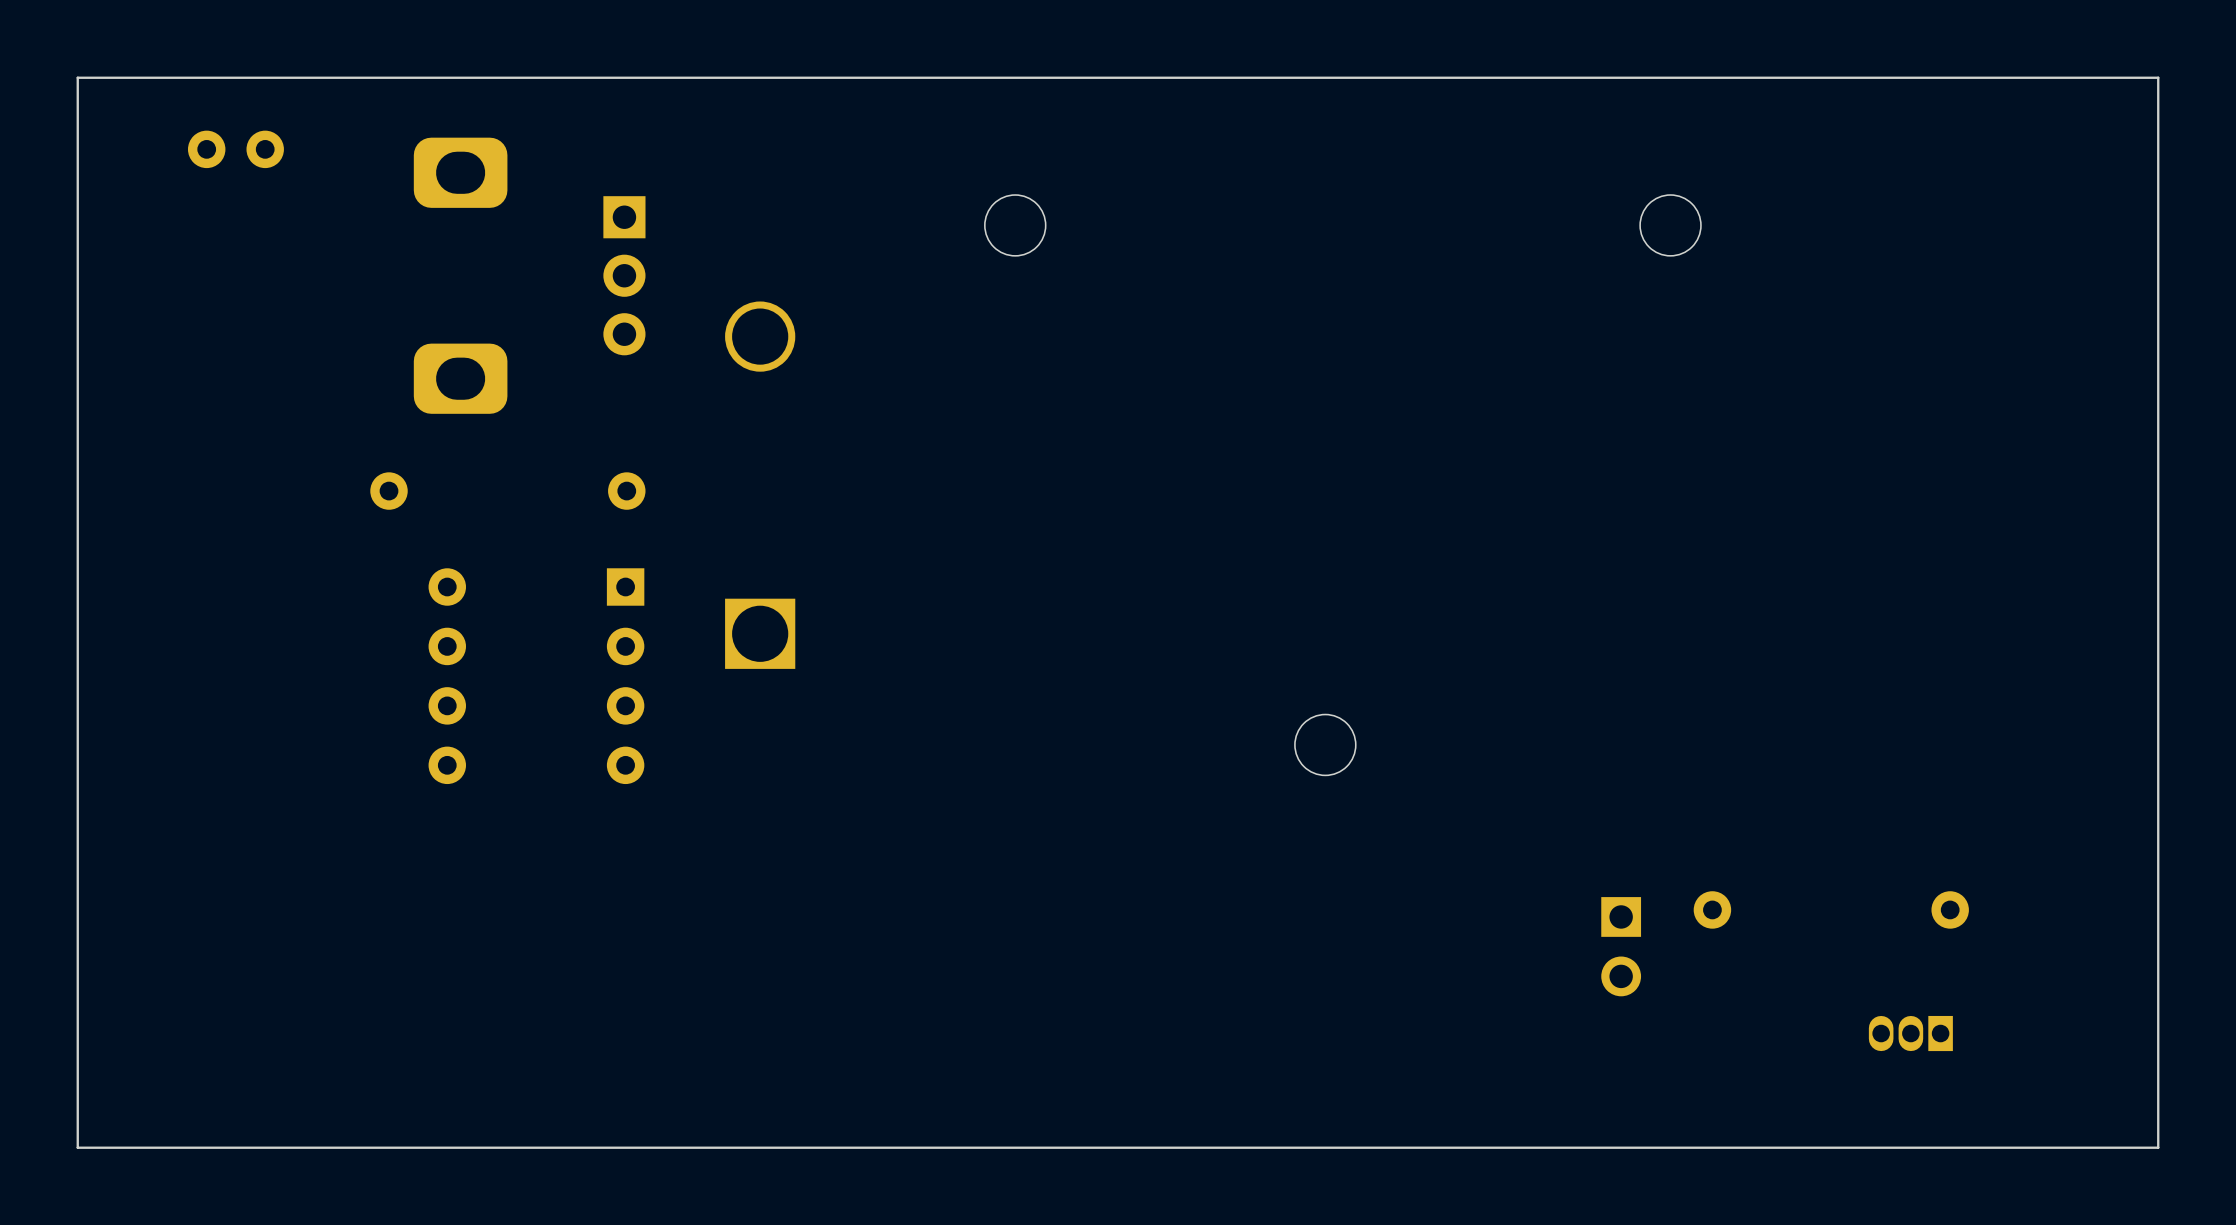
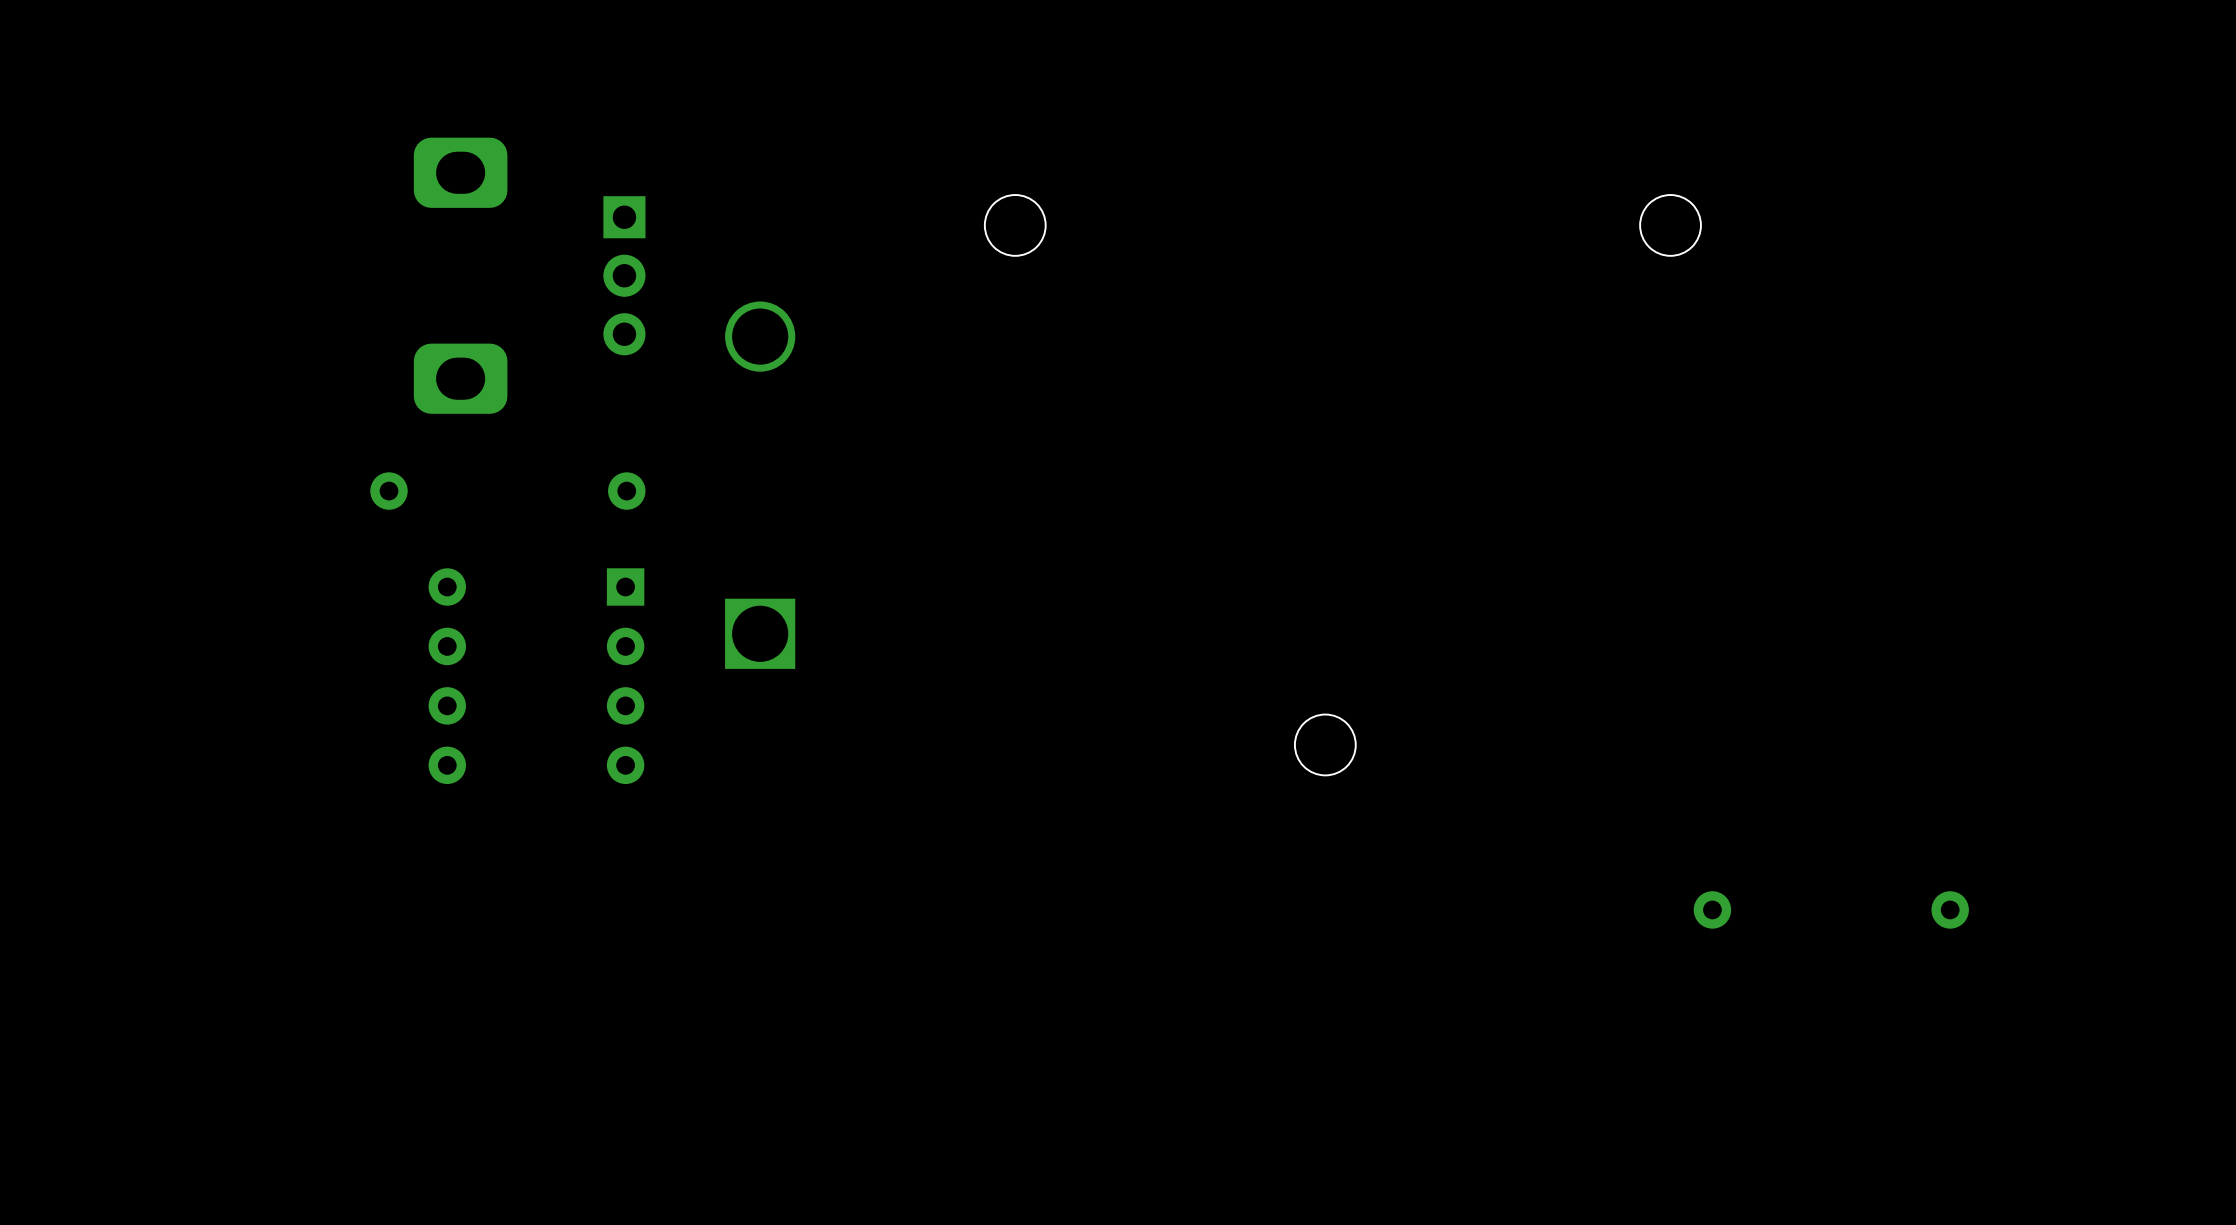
board edge: (2158, 77) (77, 77) (77, 1147) (2158, 1147) (2158, 77) -> none
part: (235, 149) -> none
part: (1621, 946) -> none
part: (1910, 1033) -> none

